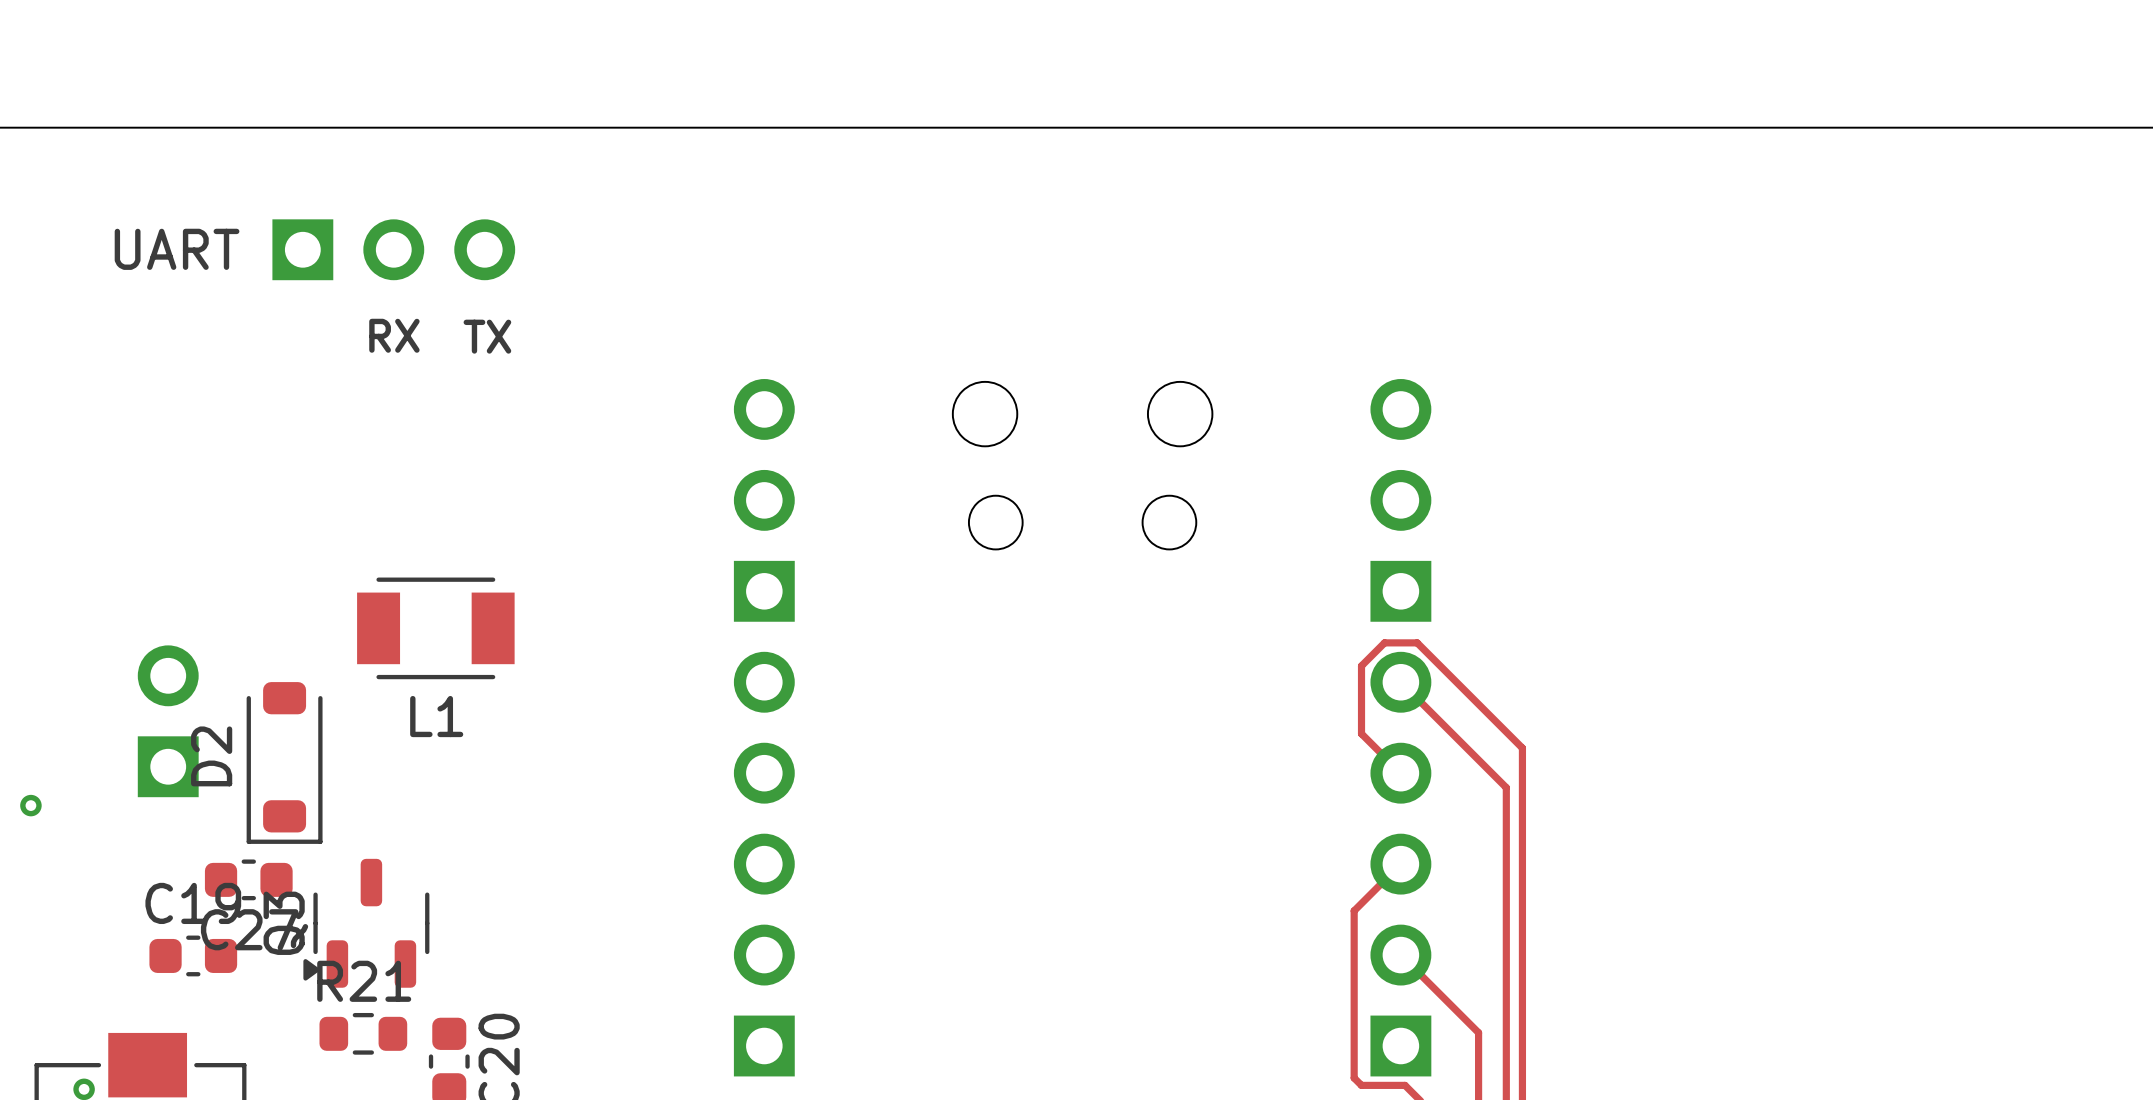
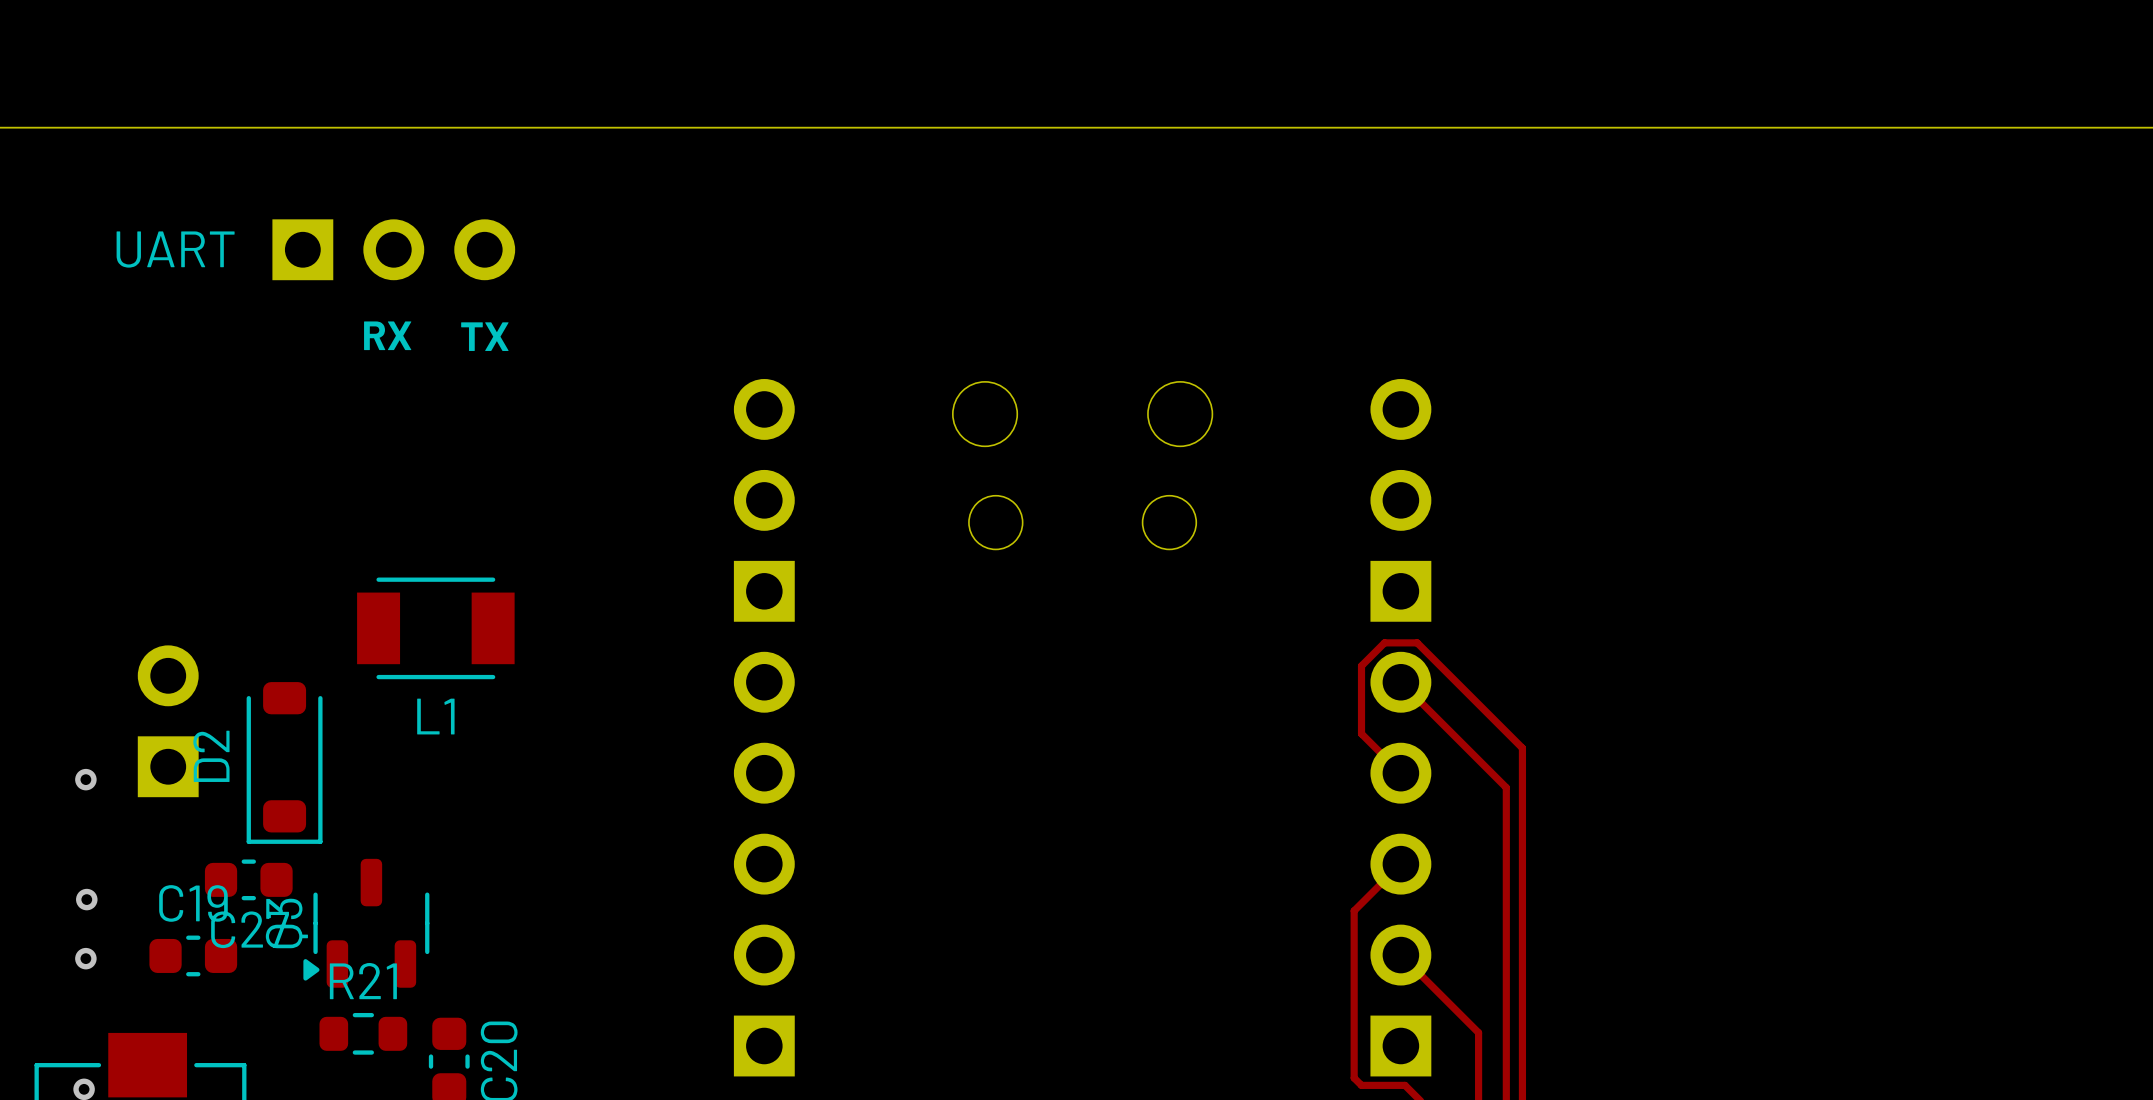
via: none -> (85, 779)
via: (30, 805) -> none
via: none -> (86, 899)
via: none -> (85, 958)

